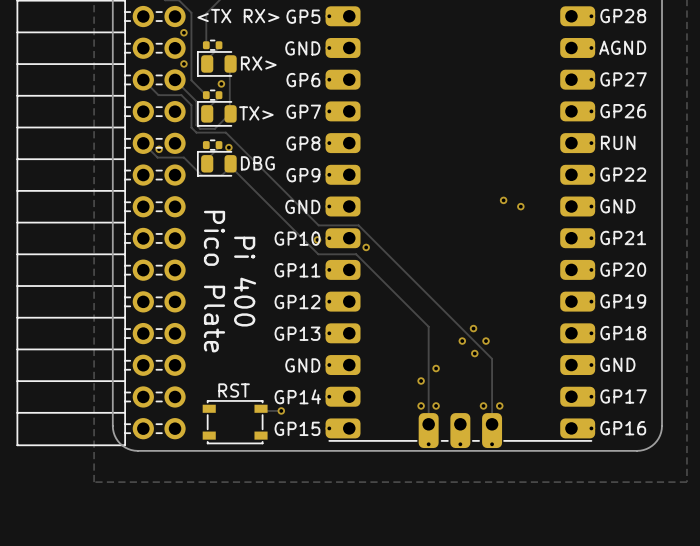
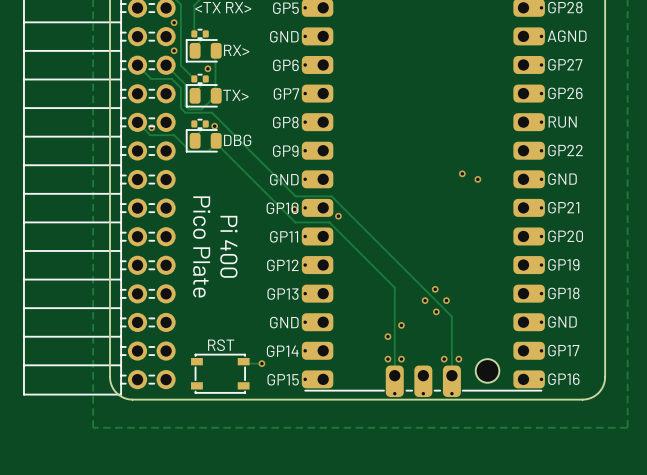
part: none -> (487, 370)

